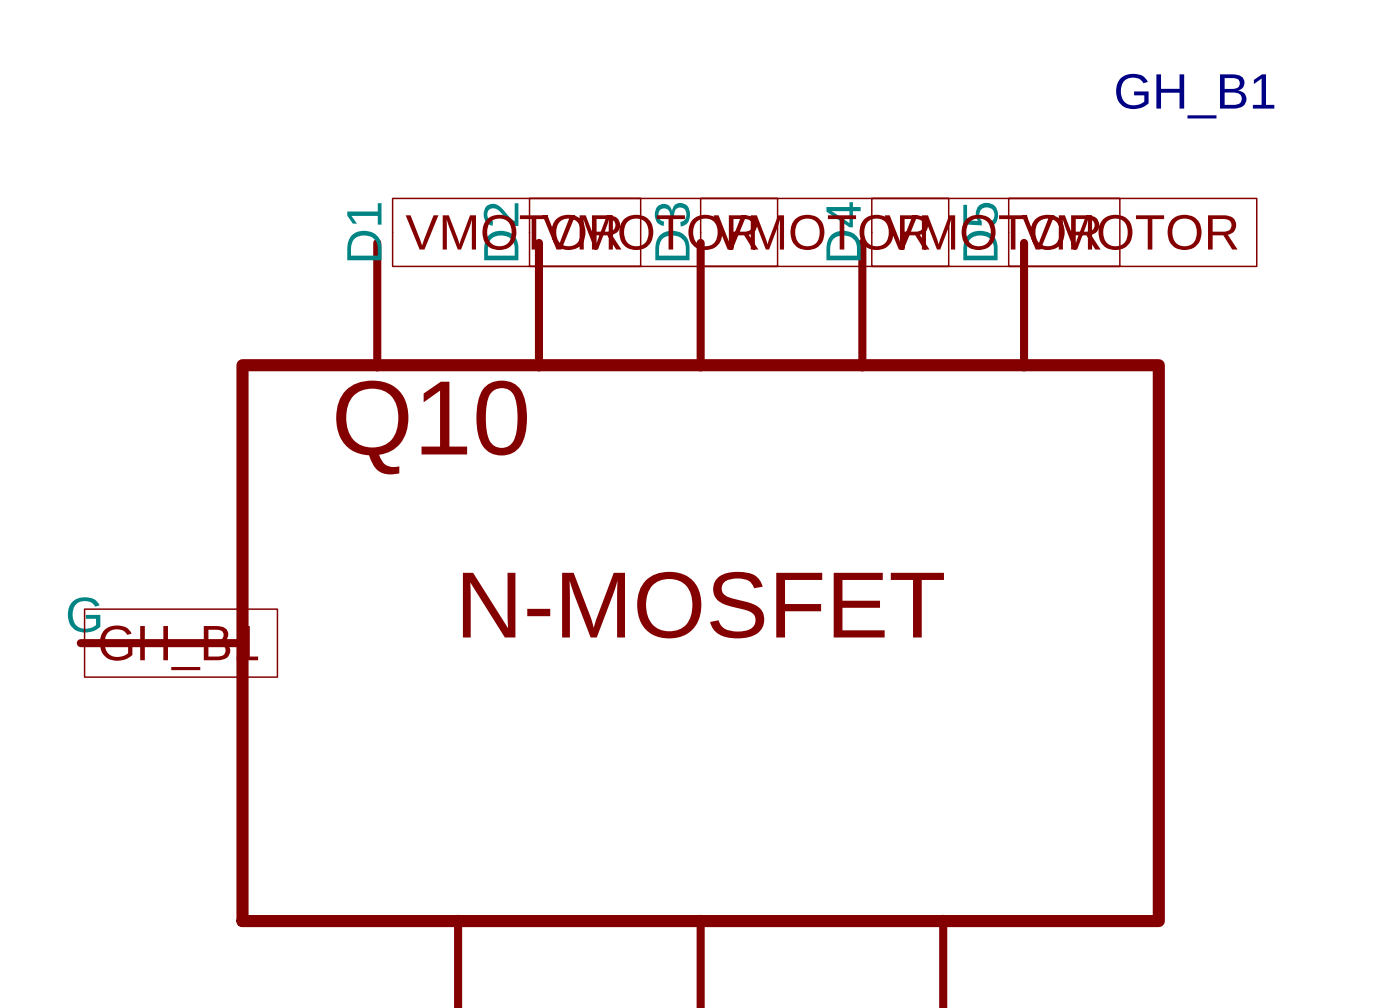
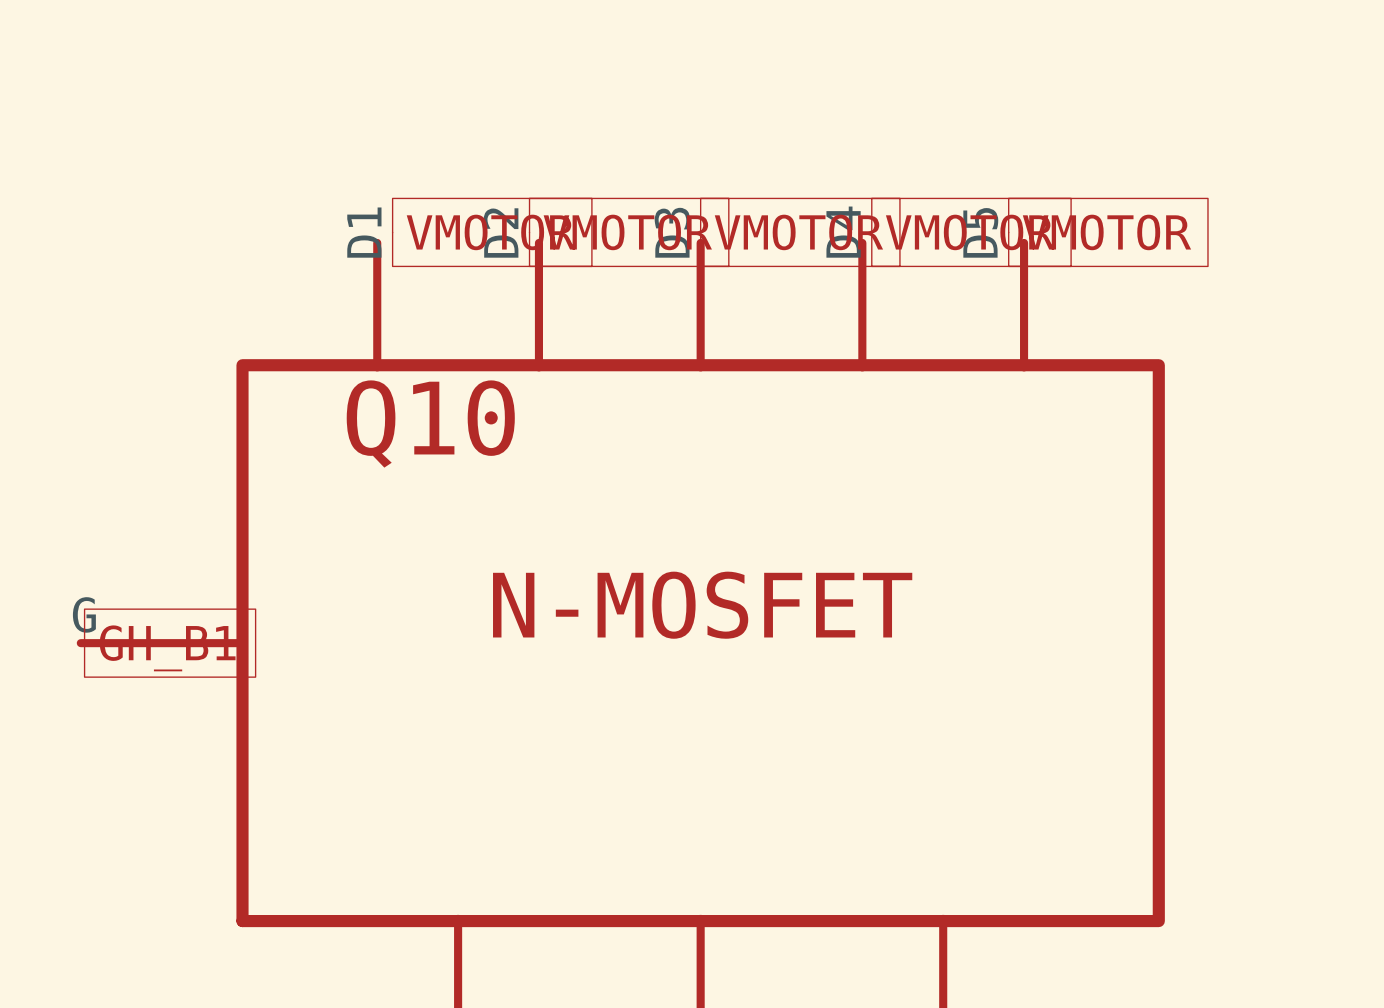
text: GH_B1 (1195, 96) -> none

